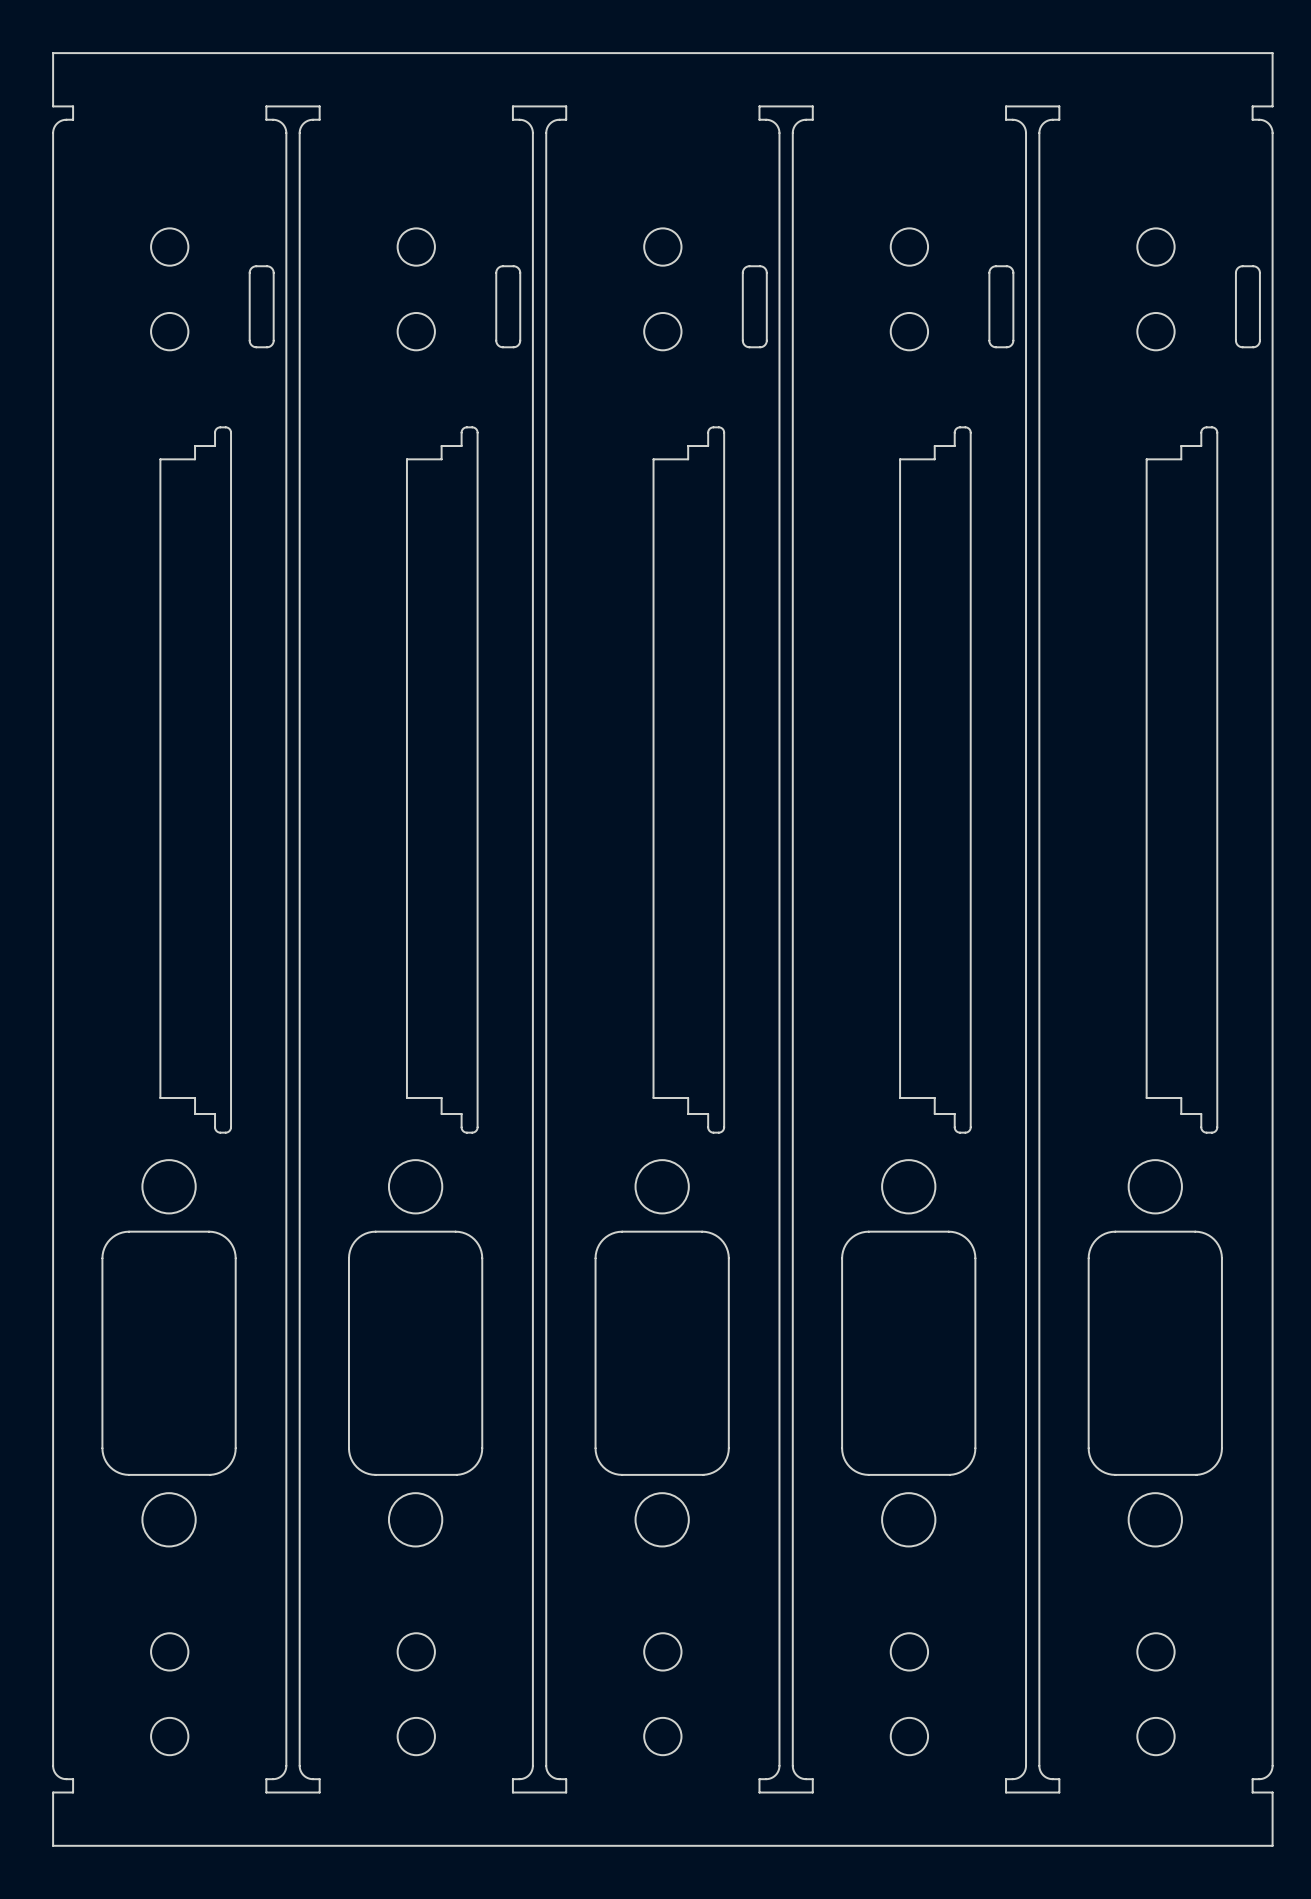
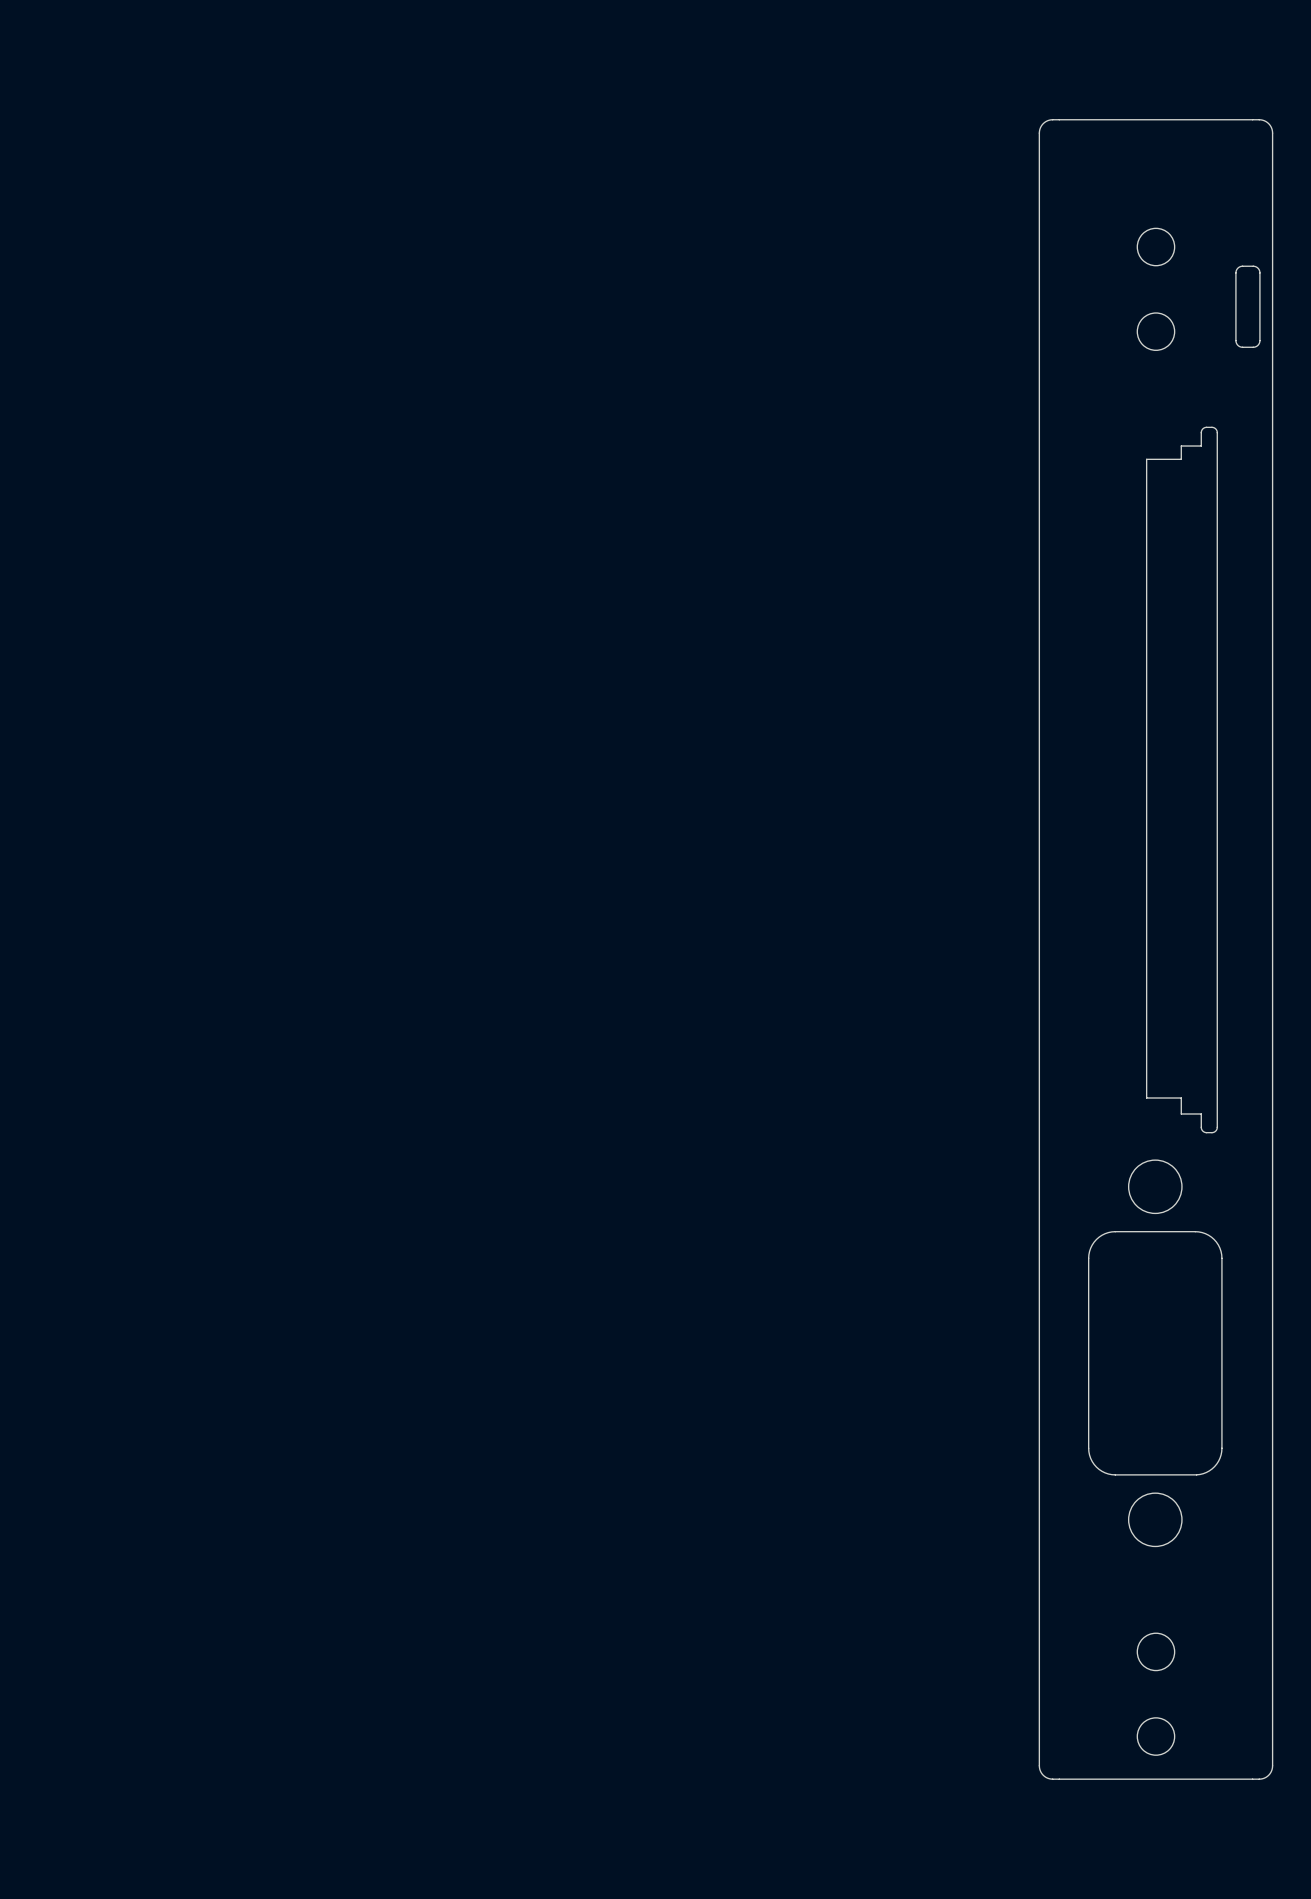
board edge: (319, 106) (319, 119) (306, 121) (301, 126) (299, 133) (299, 1765) (301, 1772) (306, 1777) (319, 1779) (319, 1792) (266, 1792) (266, 1779) (279, 1777) (284, 1772) (286, 1765) (286, 133) (284, 126) (279, 121) (266, 119) (266, 106) (319, 106) -> none
board edge: (566, 106) (566, 119) (552, 121) (548, 126) (546, 133) (546, 1765) (548, 1772) (552, 1777) (566, 1779) (566, 1792) (512, 1792) (512, 1779) (526, 1777) (531, 1772) (532, 1765) (532, 133) (531, 126) (526, 121) (512, 119) (512, 106) (566, 106) -> none
board edge: (812, 106) (812, 119) (799, 121) (794, 126) (792, 133) (792, 1765) (794, 1772) (799, 1777) (812, 1779) (812, 1792) (759, 1792) (759, 1779) (772, 1777) (777, 1772) (779, 1765) (779, 133) (777, 126) (772, 121) (759, 119) (759, 106) (812, 106) -> none
board edge: (1059, 119) (1059, 106) (1006, 106) (1006, 119) (1019, 121) (1024, 126) (1026, 133) (1026, 1765) (1024, 1772) (1019, 1777) (1006, 1779) (1006, 1792) (1059, 1792) (1059, 1779) -> (1252, 1779) (1059, 1779)
board edge: (1252, 119) (1252, 106) (1272, 106) (1272, 53) (53, 53) (53, 106) (73, 106) (73, 119) (59, 121) (54, 126) (53, 133) (53, 1765) (54, 1772) (59, 1777) (73, 1779) (73, 1792) (53, 1792) (53, 1845) (1272, 1845) (1272, 1792) (1252, 1792) (1252, 1779) -> (1252, 119) (1059, 119)
round board edge: [150, 227, 190, 267] -> none
round board edge: [396, 227, 436, 267] -> none
round board edge: [643, 227, 683, 267] -> none
round board edge: [890, 227, 929, 267] -> none
board edge: (267, 266) (254, 266) (249, 272) (249, 341) (255, 347) (268, 347) (273, 341) (273, 272) (271, 268) (267, 266) -> none
board edge: (513, 266) (501, 266) (496, 272) (496, 341) (502, 347) (515, 347) (520, 341) (520, 272) (518, 268) (513, 266) -> none
board edge: (760, 266) (747, 266) (742, 272) (742, 341) (748, 347) (761, 347) (766, 341) (766, 272) (764, 268) (760, 266) -> none
board edge: (1006, 266) (994, 266) (989, 272) (989, 341) (995, 347) (1008, 347) (1013, 341) (1013, 272) (1011, 268) (1006, 266) -> none
round board edge: [150, 312, 190, 351] -> none
round board edge: [396, 312, 436, 351] -> none
round board edge: [643, 312, 683, 351] -> none
round board edge: [890, 312, 929, 351] -> none
board edge: (225, 427) (218, 427) (215, 430) (215, 446) (195, 446) (195, 459) (160, 459) (160, 1098) (195, 1098) (195, 1113) (215, 1113) (215, 1128) (220, 1132) (228, 1131) (231, 1127) (231, 432) (229, 428) (225, 427) -> none
board edge: (472, 427) (465, 427) (462, 430) (461, 446) (441, 446) (441, 459) (406, 459) (406, 1098) (441, 1098) (441, 1113) (461, 1113) (461, 1128) (466, 1132) (474, 1131) (477, 1127) (477, 432) (476, 428) (472, 427) -> none
board edge: (718, 427) (712, 427) (708, 430) (708, 446) (688, 446) (688, 459) (653, 459) (653, 1098) (688, 1098) (688, 1113) (708, 1113) (708, 1128) (713, 1132) (721, 1131) (724, 1127) (724, 432) (722, 428) (718, 427) -> none
board edge: (965, 427) (958, 427) (955, 430) (954, 446) (934, 446) (934, 459) (900, 459) (900, 1098) (934, 1098) (934, 1113) (954, 1113) (954, 1128) (960, 1132) (968, 1131) (970, 1127) (970, 432) (969, 428) (965, 427) -> none
round board edge: [141, 1159, 197, 1215] -> none
round board edge: [388, 1159, 443, 1215] -> none
round board edge: [634, 1159, 690, 1215] -> none
round board edge: [881, 1159, 937, 1215] -> none
board edge: (209, 1231) (125, 1231) (112, 1237) (104, 1248) (102, 1258) (102, 1448) (107, 1464) (118, 1472) (129, 1474) (213, 1474) (225, 1468) (233, 1458) (235, 1448) (235, 1254) (227, 1239) (219, 1233) (209, 1231) -> none
board edge: (455, 1231) (372, 1231) (359, 1237) (351, 1248) (348, 1258) (348, 1448) (354, 1464) (365, 1472) (375, 1474) (460, 1474) (472, 1468) (480, 1458) (482, 1448) (482, 1254) (474, 1239) (465, 1233) (455, 1231) -> none
board edge: (702, 1231) (618, 1231) (605, 1237) (597, 1248) (595, 1258) (595, 1448) (601, 1464) (612, 1472) (622, 1474) (706, 1474) (718, 1468) (726, 1458) (728, 1448) (728, 1254) (721, 1239) (712, 1233) (702, 1231) -> none
board edge: (948, 1231) (865, 1231) (852, 1237) (844, 1248) (842, 1258) (842, 1448) (847, 1464) (858, 1472) (868, 1474) (953, 1474) (965, 1468) (973, 1458) (975, 1448) (975, 1254) (967, 1239) (958, 1233) (948, 1231) -> none
round board edge: [141, 1492, 197, 1548] -> none
round board edge: [388, 1492, 443, 1548] -> none
round board edge: [634, 1492, 690, 1548] -> none
round board edge: [881, 1492, 937, 1548] -> none
round board edge: [150, 1632, 190, 1672] -> none
round board edge: [396, 1632, 436, 1672] -> none
round board edge: [643, 1632, 683, 1672] -> none
round board edge: [890, 1632, 929, 1672] -> none
round board edge: [150, 1717, 190, 1756] -> none
round board edge: [396, 1717, 436, 1756] -> none
round board edge: [643, 1717, 683, 1756] -> none
round board edge: [890, 1717, 929, 1756] -> none

